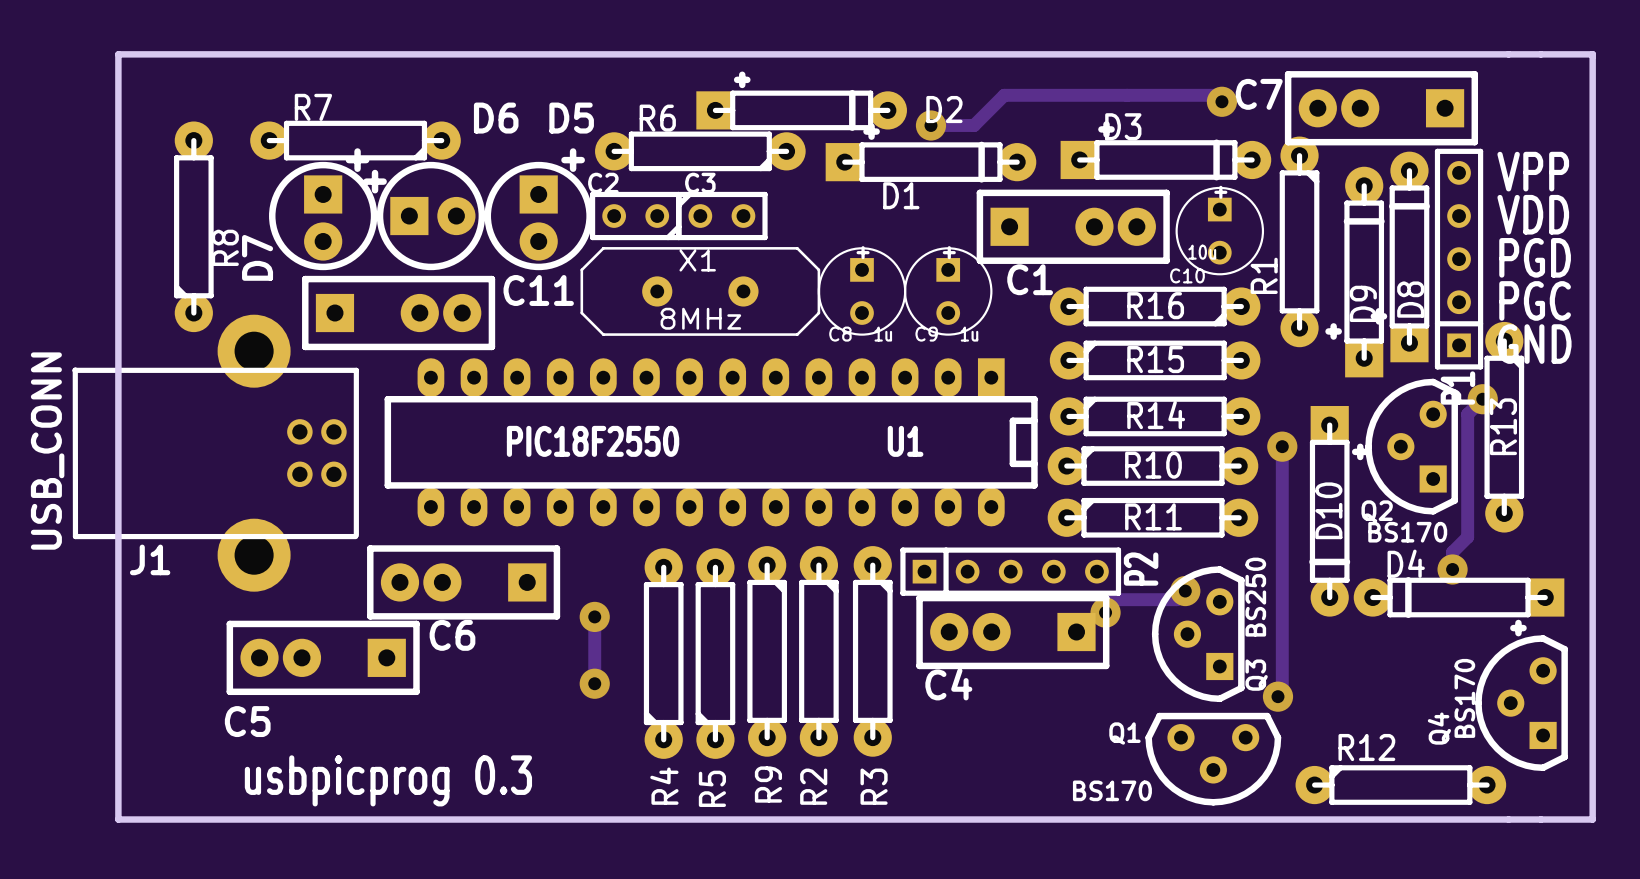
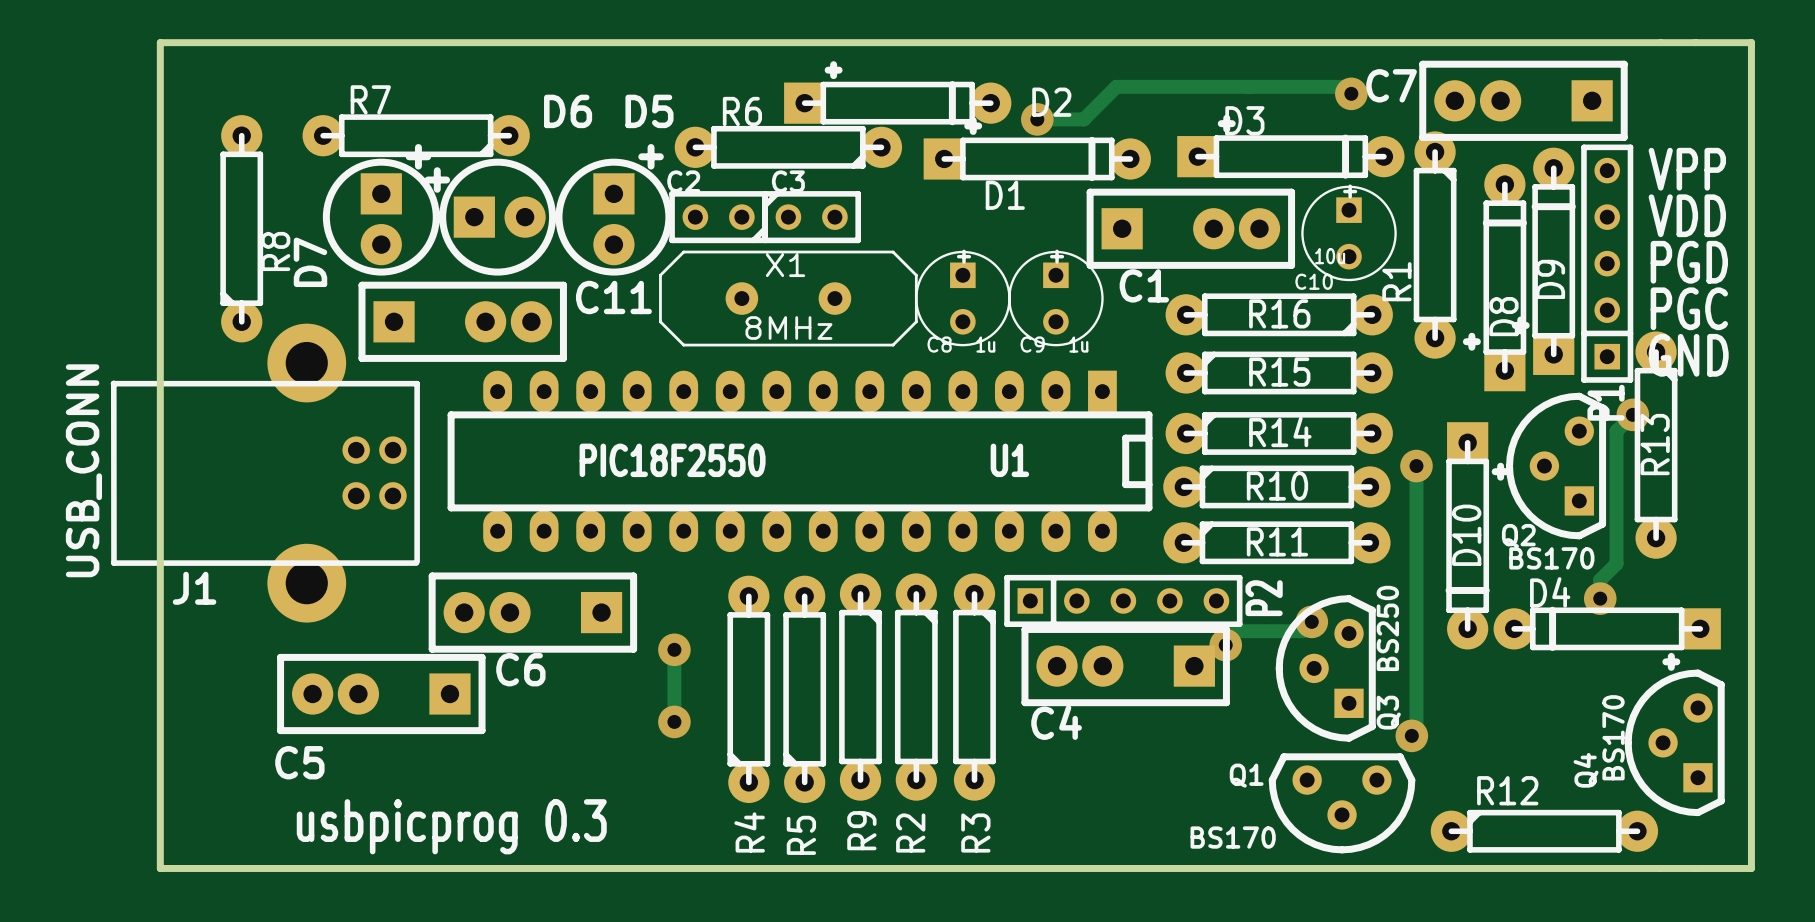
D8 name position: D8 (1410, 299) -> D8 (1503, 316)
D9 name position: D9 (1363, 303) -> D9 (1550, 279)

